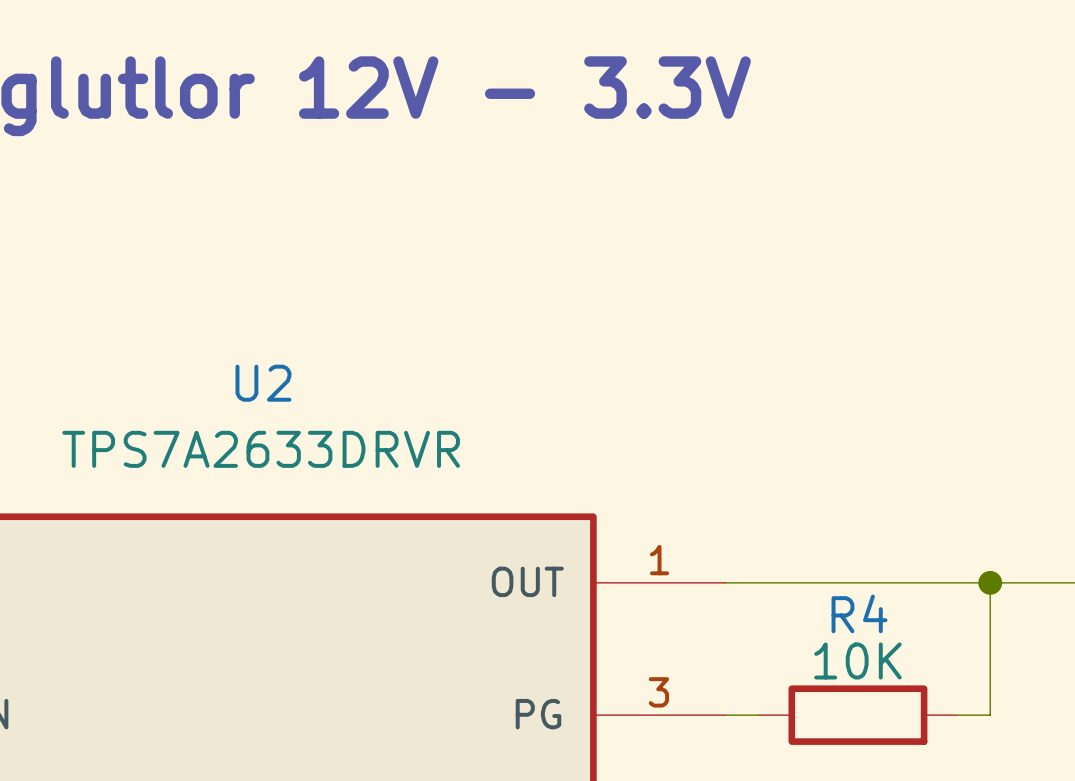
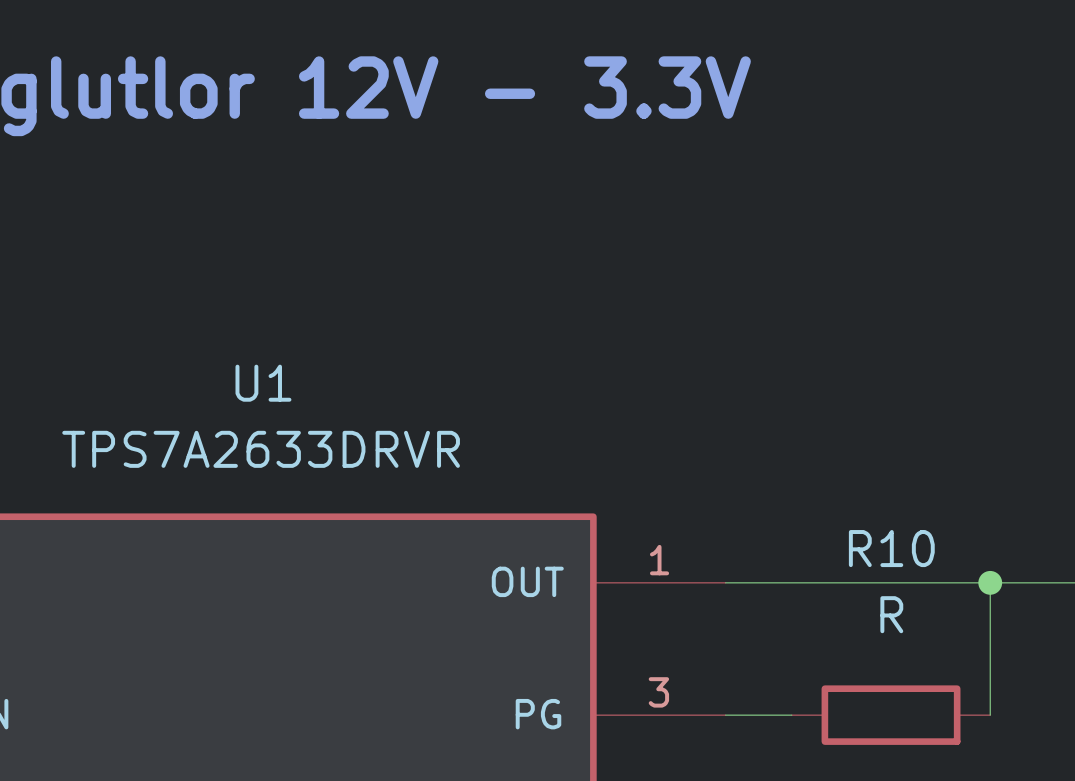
U2 name: U2 (263, 383) -> U1 (263, 383)
R4: 10K (857, 715) -> none
R10: none -> R (891, 715)

